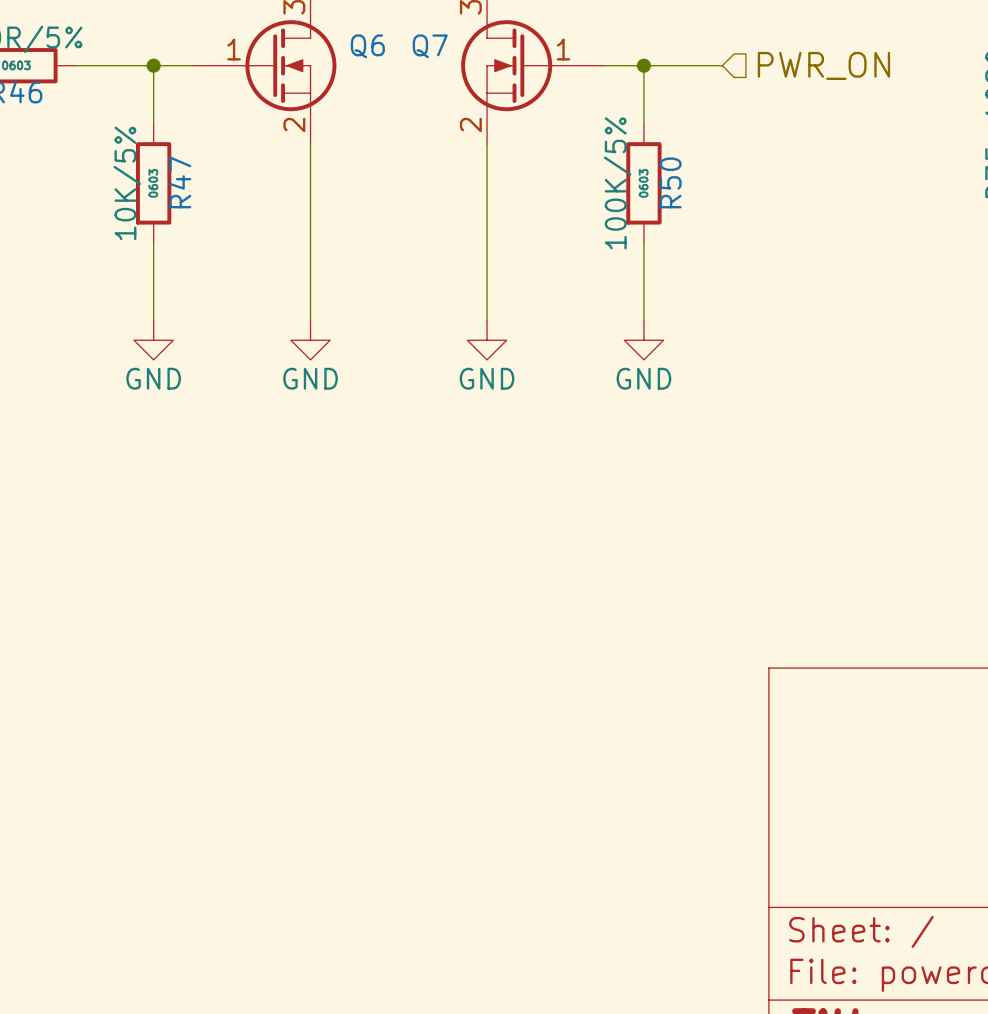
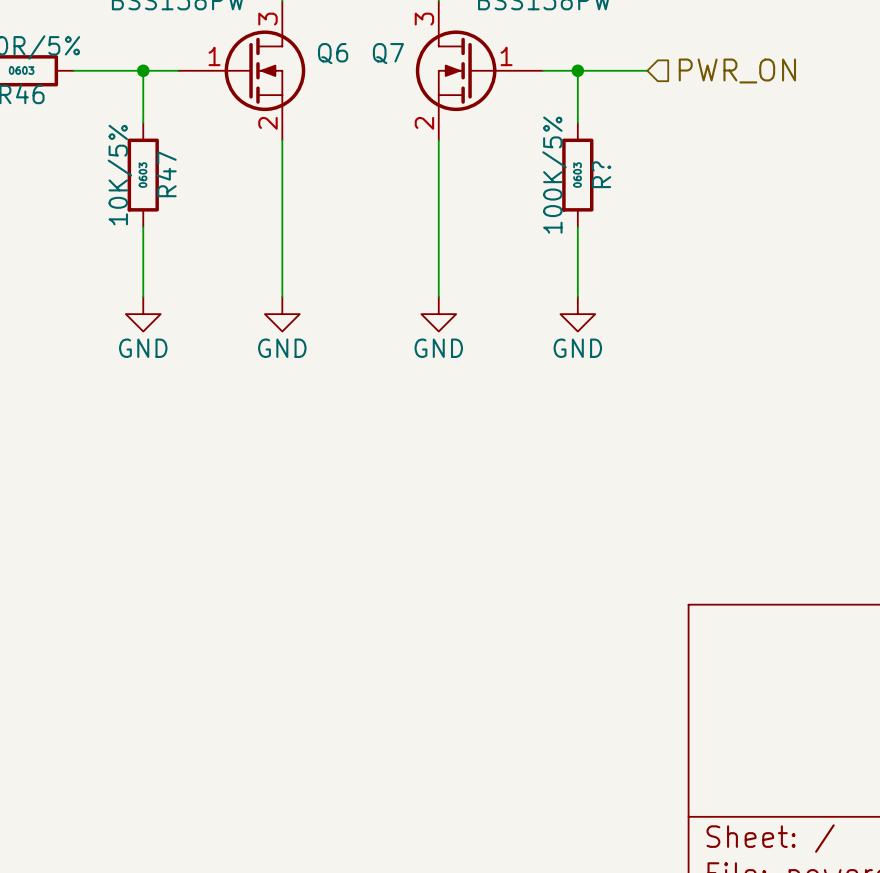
R50 name: R50 (670, 182) -> R? (601, 174)

